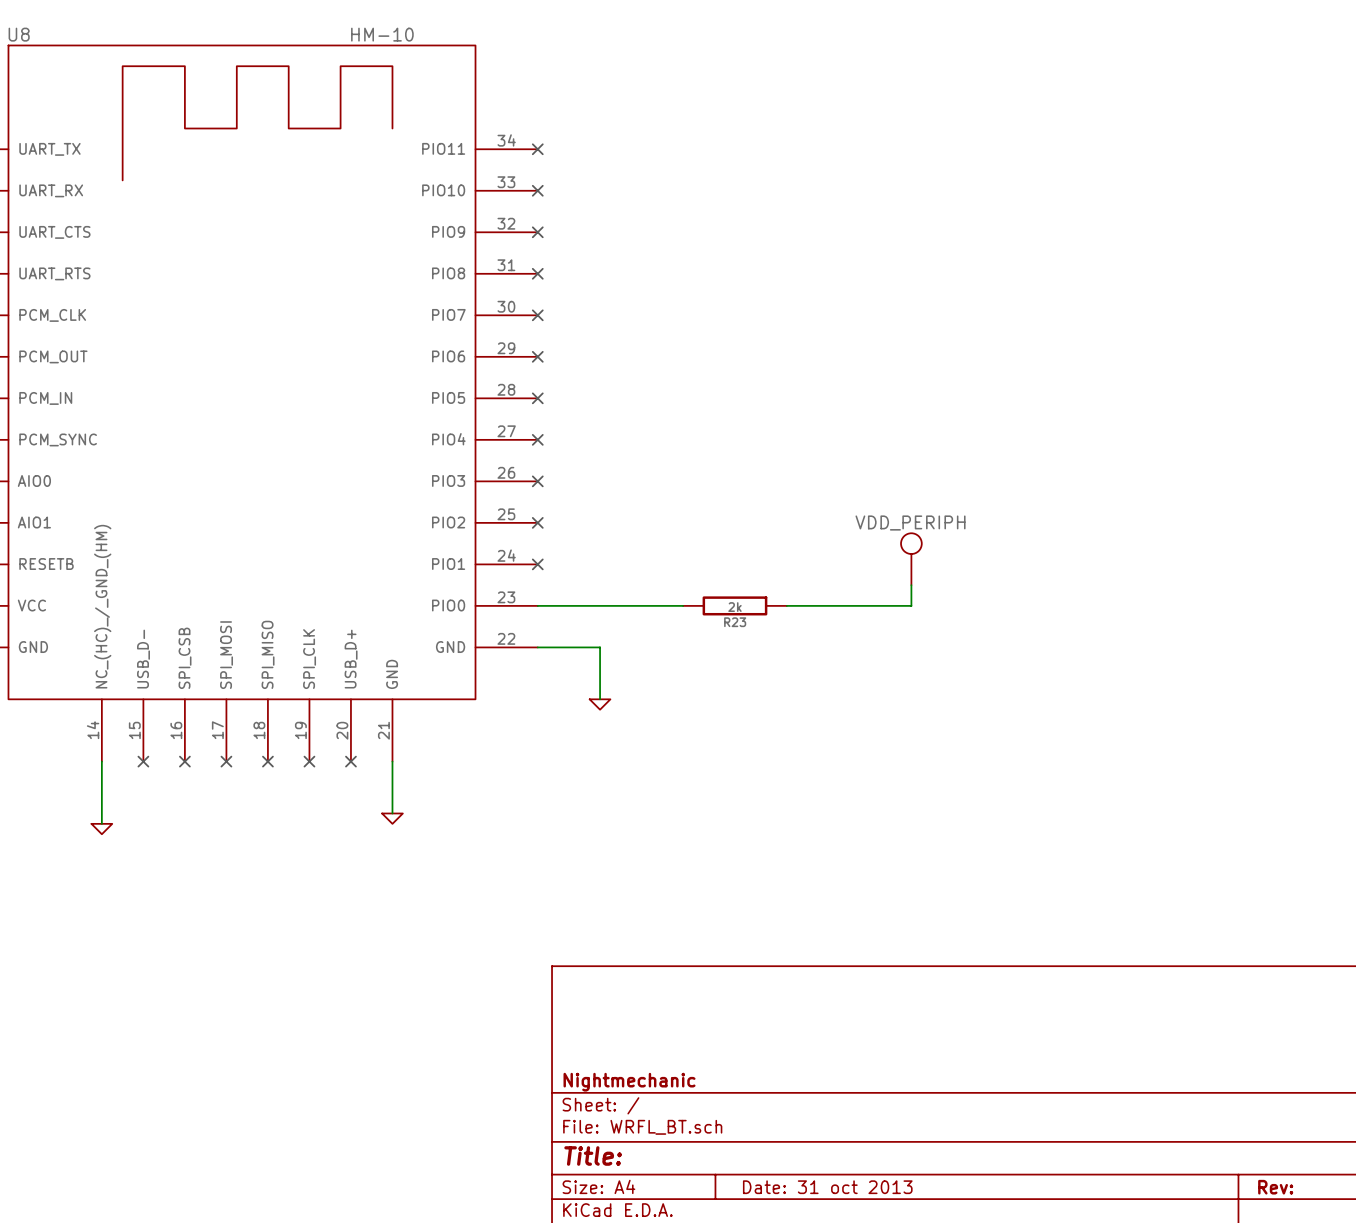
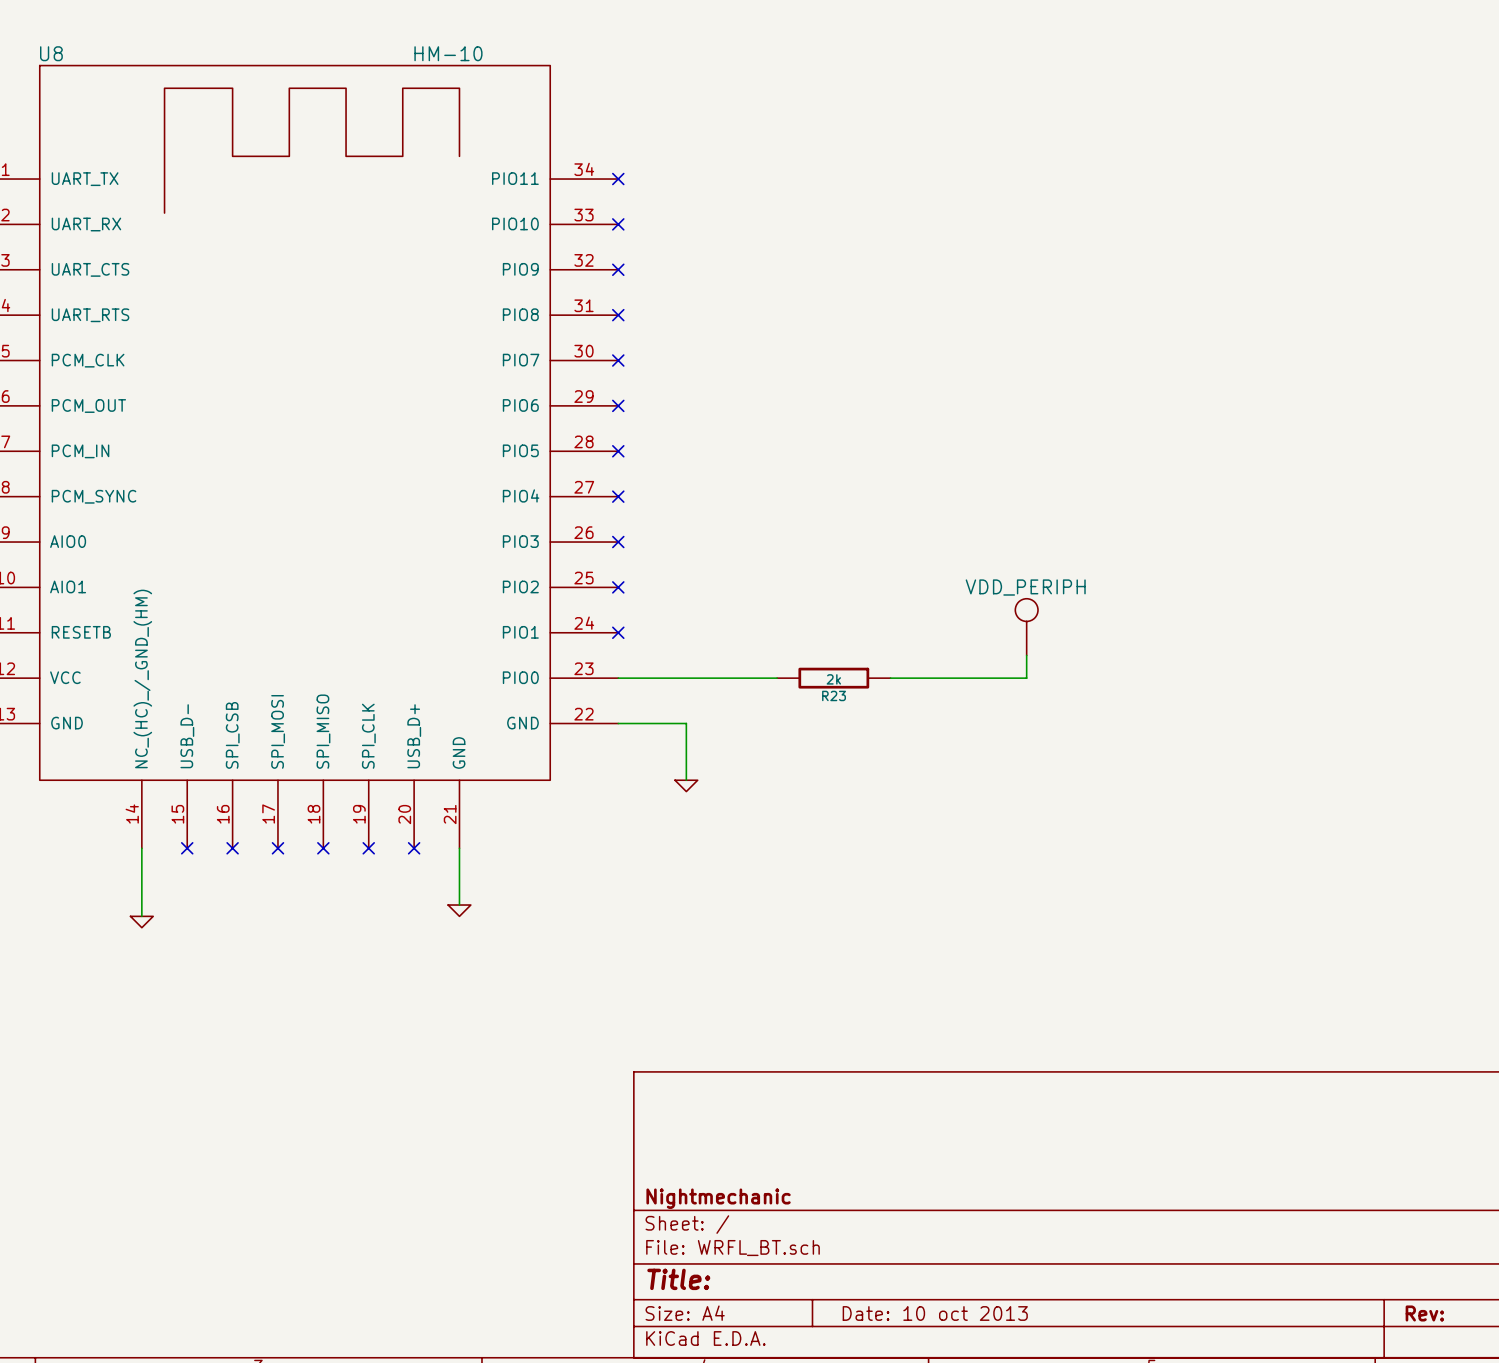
title block: Date: 31 oct 2013 (827, 1187) -> Date: 10 oct 2013 (935, 1313)

